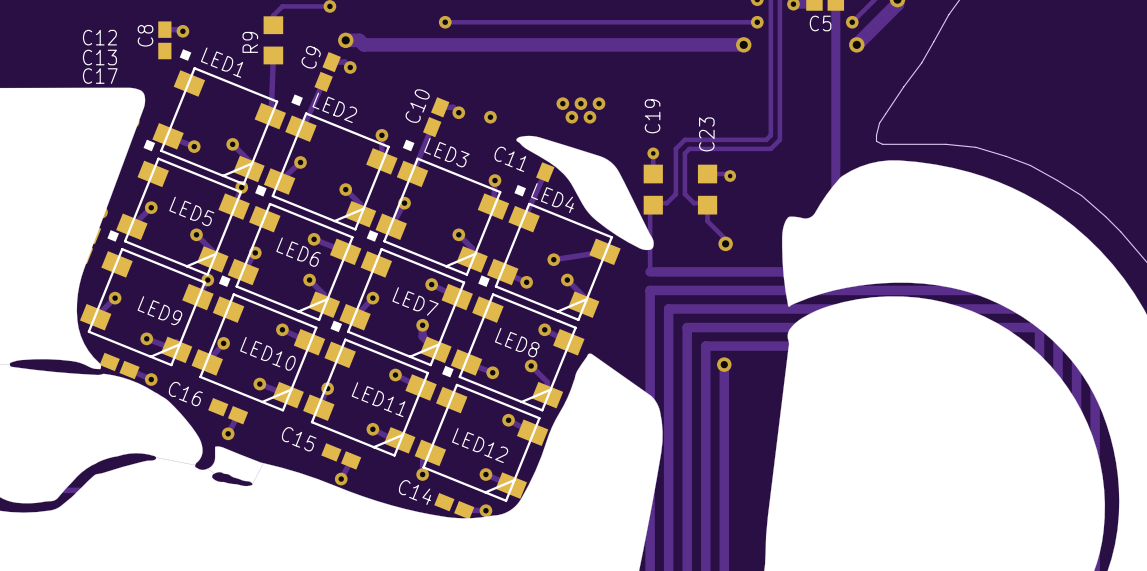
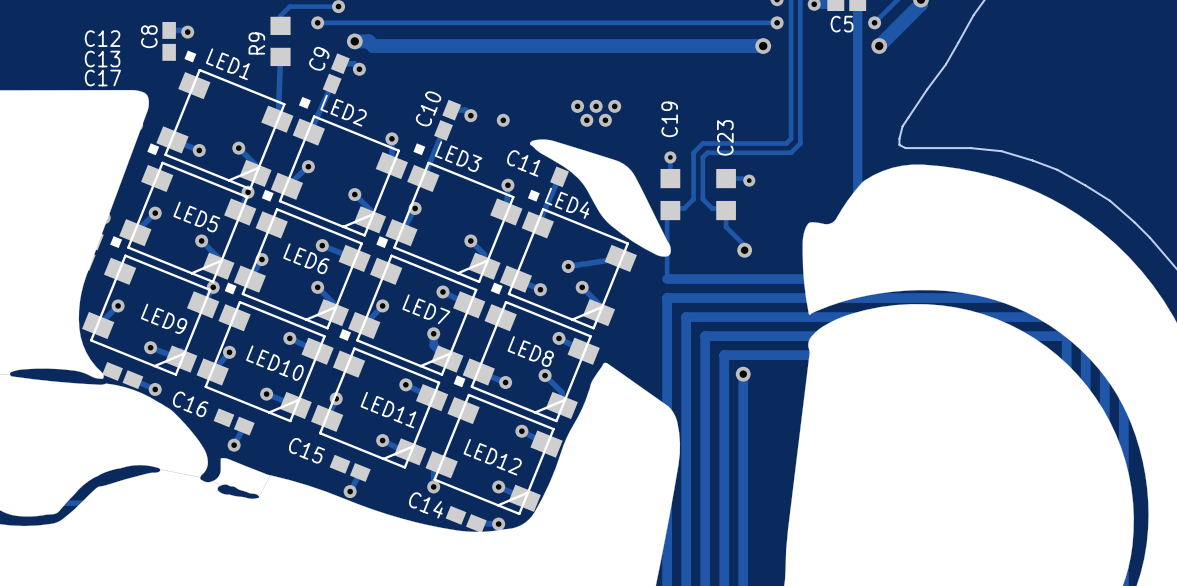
track: none -> (317, 22) (456, 22)
via: none -> (317, 22)
via: (445, 22) -> none

